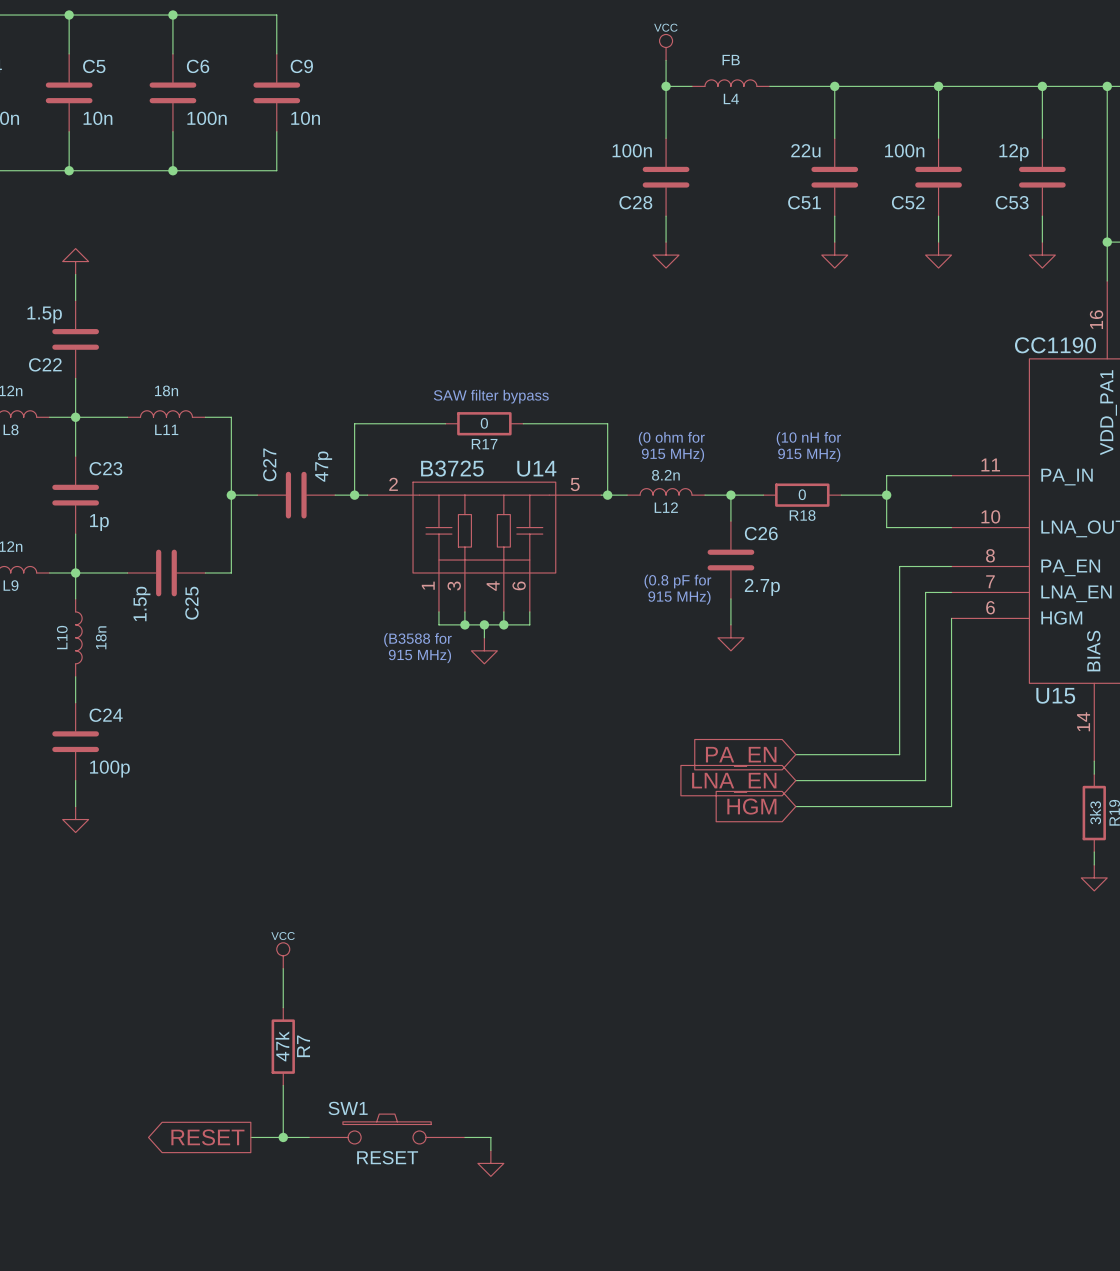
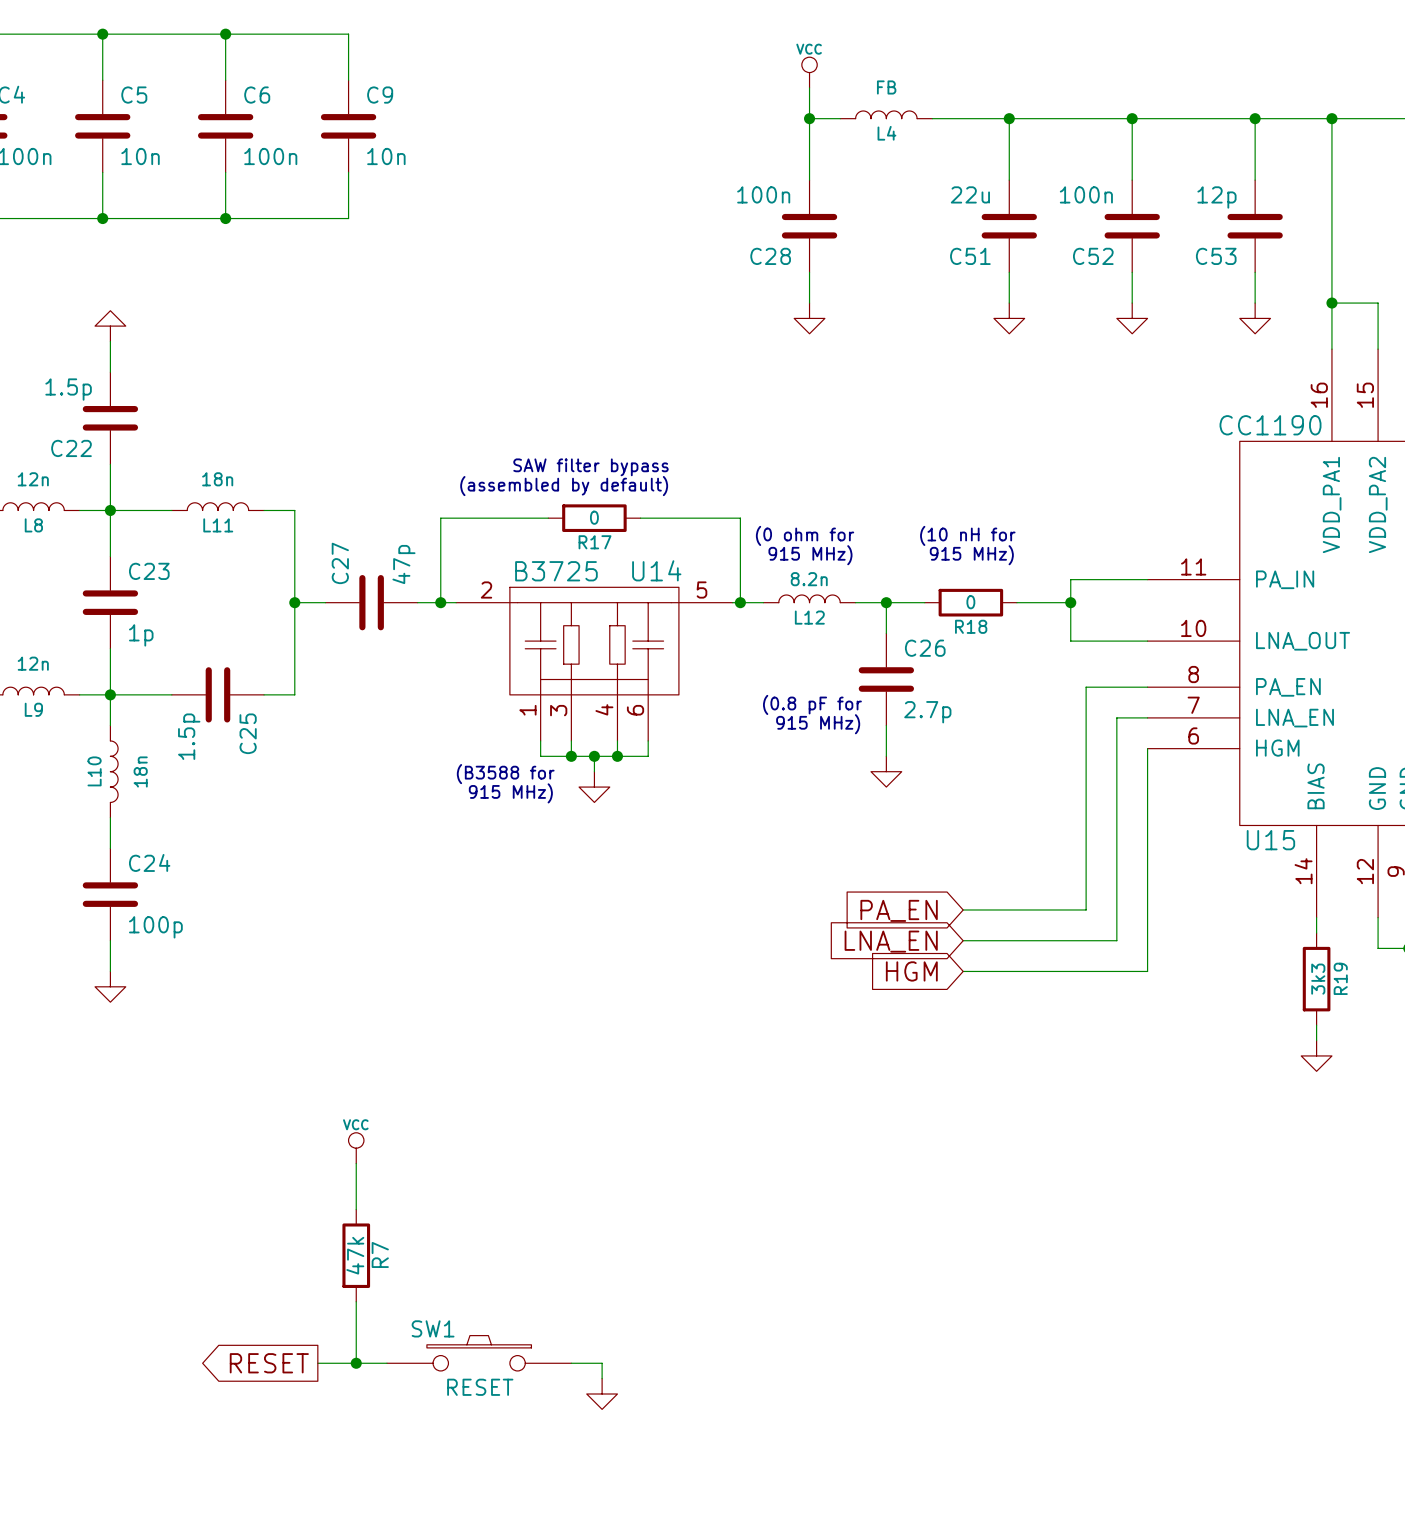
text: none -> SAW filter bypass (590, 467)
text: SAW filter bypass (491, 396) -> (assembled by default) (564, 486)

